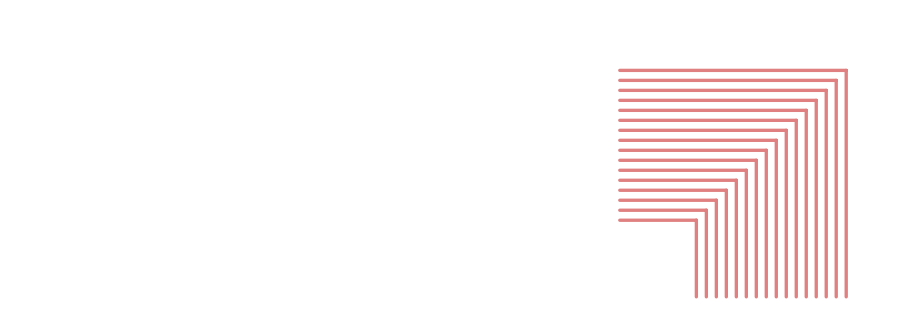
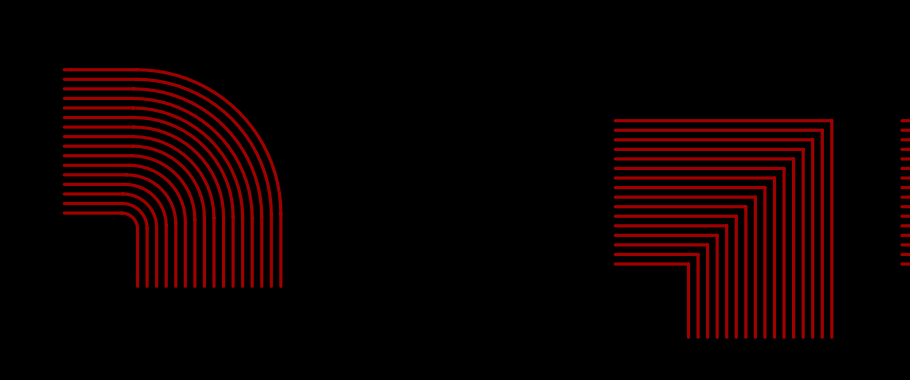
top track: none -> (64, 69) (136, 69) (167, 73) (205, 87) (238, 111) (263, 144) (277, 183) (280, 213) (280, 286)
top track: none -> (64, 79) (136, 79) (167, 83) (187, 89) (206, 99) (231, 118) (251, 143) (261, 162) (267, 182) (271, 214) (271, 286)
top track: none -> (64, 88) (133, 88) (163, 92) (182, 98) (200, 107) (224, 126) (242, 149) (252, 167) (258, 187) (261, 216) (261, 286)
top track: none -> (64, 98) (132, 98) (160, 101) (195, 116) (217, 133) (239, 163) (248, 190) (252, 217) (252, 286)
top track: none -> (64, 107) (151, 109) (170, 114) (187, 122) (210, 140) (222, 154) (232, 171) (240, 198) (242, 286)
top track: none -> (64, 117) (151, 119) (175, 126) (190, 135) (204, 146) (219, 166) (227, 182) (231, 199) (233, 286)
top track: none -> (64, 127) (149, 128) (178, 139) (197, 153) (215, 178) (222, 201) (223, 286)
top track: none -> (64, 136) (148, 138) (171, 146) (190, 160) (204, 179) (212, 201) (213, 286)
top track: none -> (64, 146) (146, 147) (166, 154) (183, 167) (195, 184) (203, 203) (204, 286)
top track: none -> (64, 155) (138, 156) (158, 162) (176, 174) (188, 191) (194, 212) (194, 286)
top track: none -> (64, 165) (135, 165) (153, 170) (168, 181) (179, 197) (184, 215) (185, 286)
top track: none -> (64, 174) (132, 175) (148, 179) (161, 189) (170, 202) (175, 218) (175, 286)
top track: none -> (64, 184) (129, 184) (142, 188) (154, 196) (162, 207) (165, 220) (166, 286)
top track: none -> (64, 193) (127, 194) (139, 198) (146, 203) (152, 210) (156, 223) (156, 286)
top track: none -> (64, 203) (125, 203) (139, 210) (146, 225) (147, 286)
top track: none -> (64, 213) (123, 213) (132, 217) (137, 227) (137, 286)

